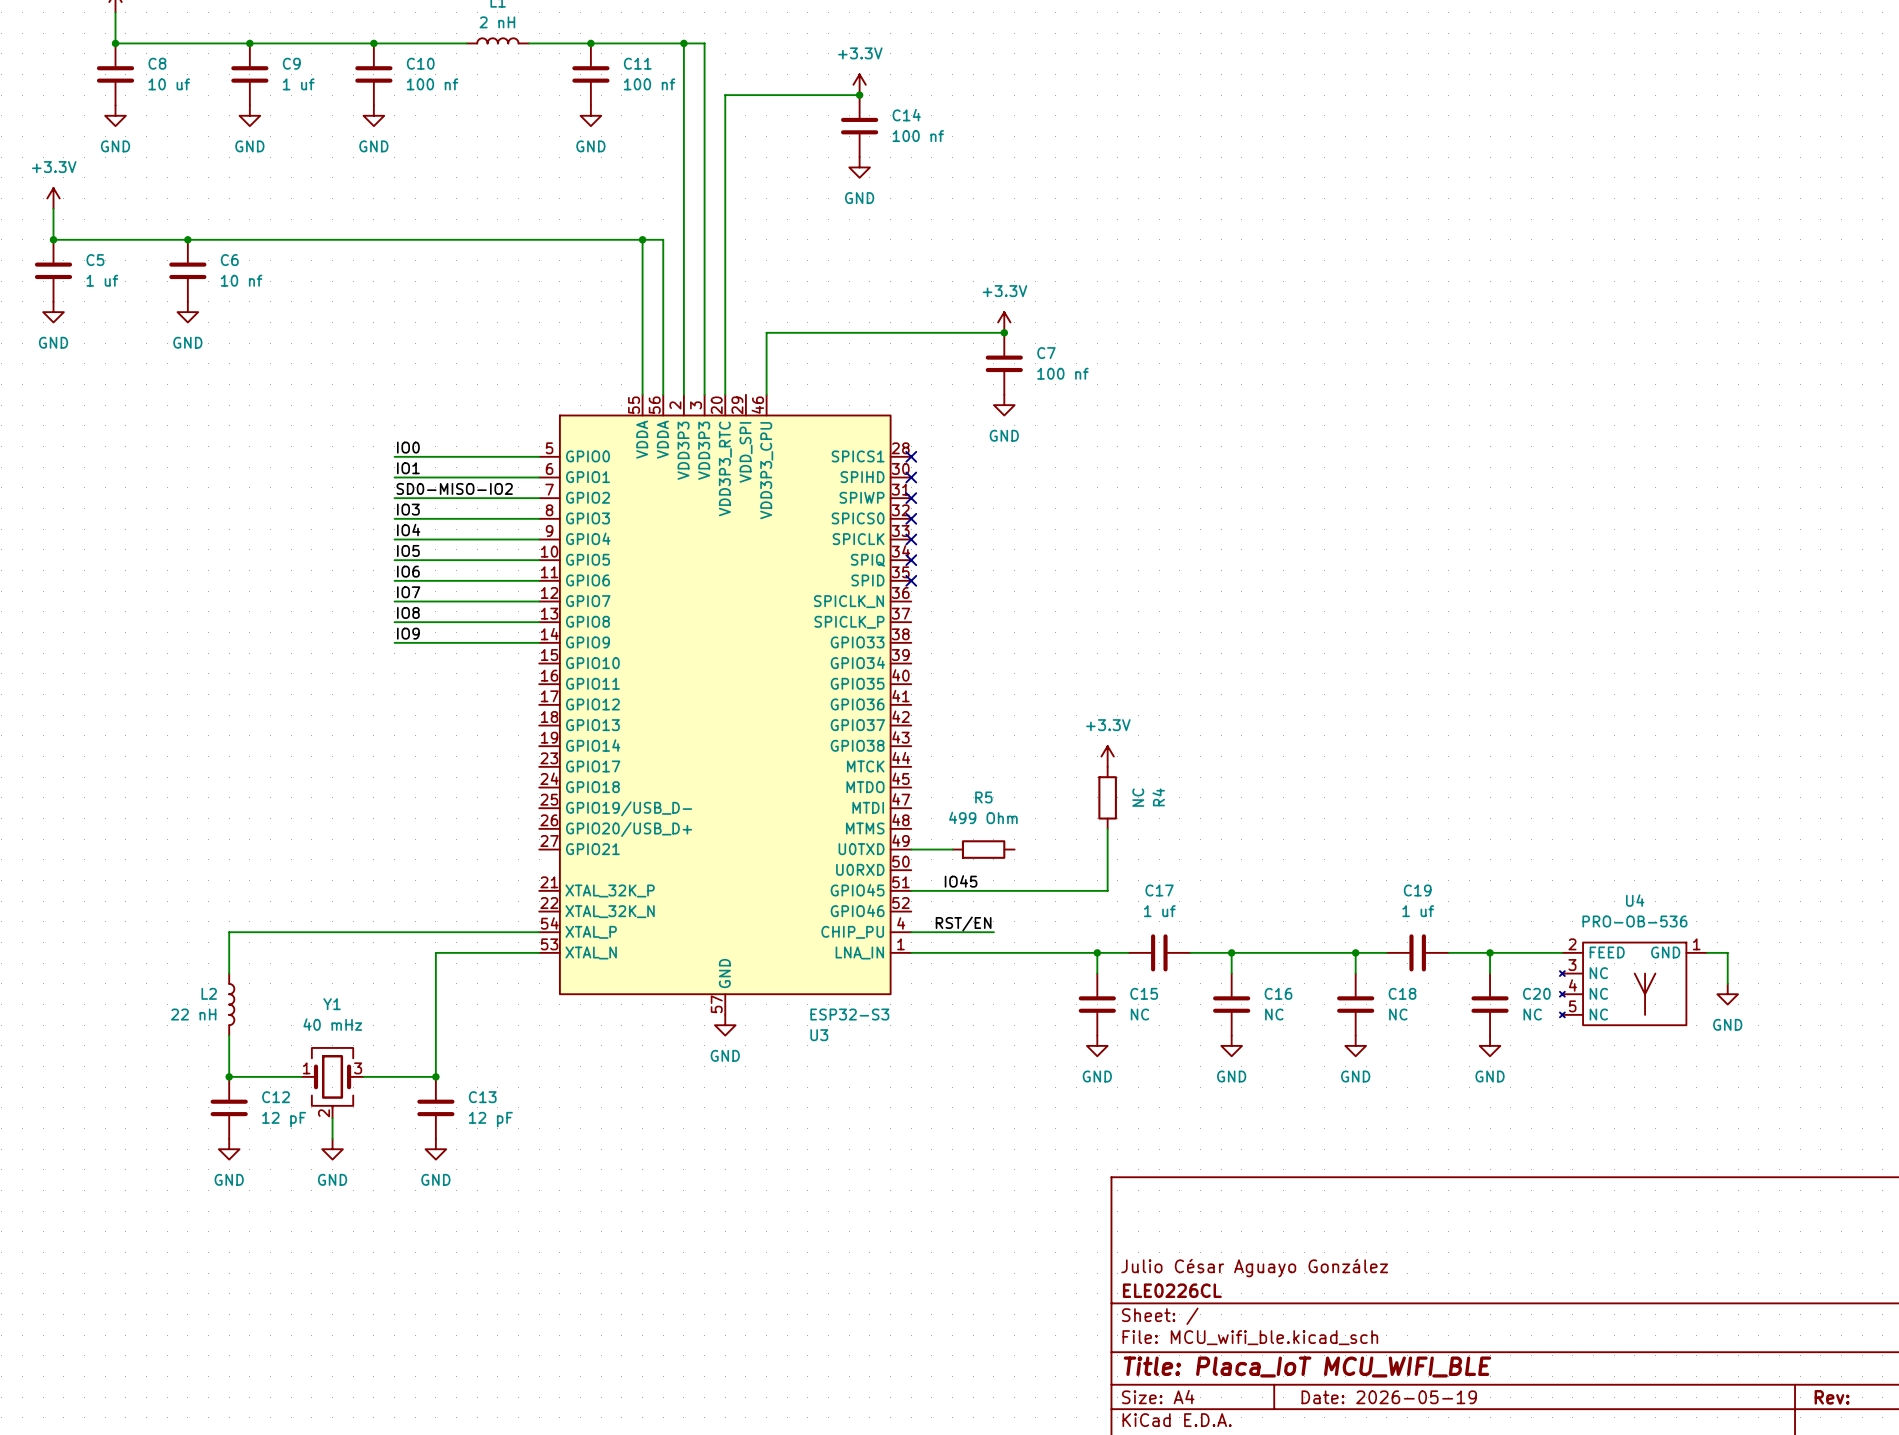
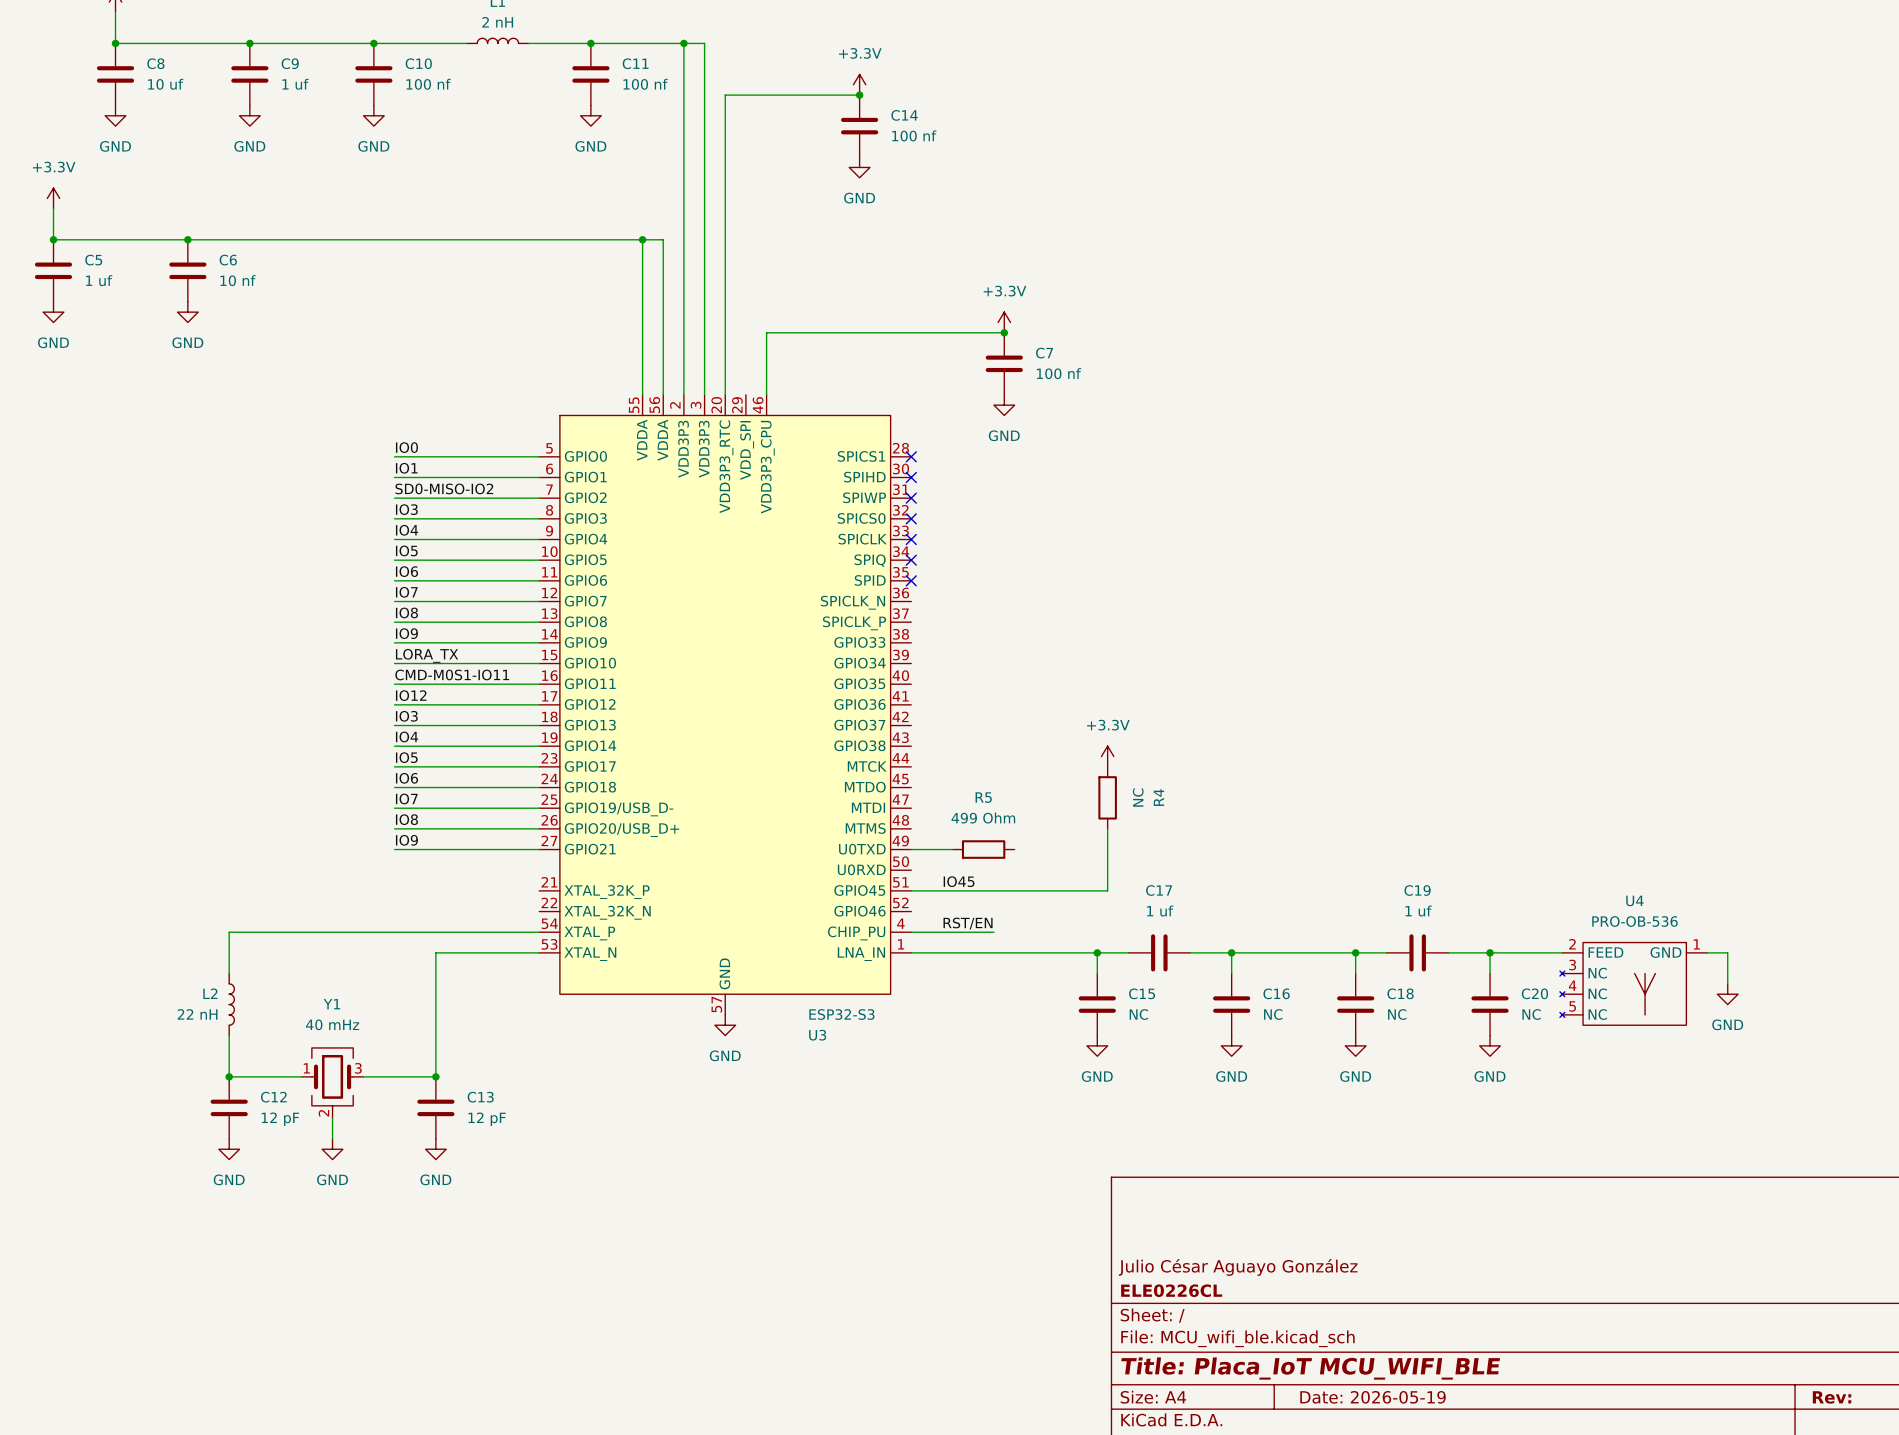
label: none -> LORA_TX (427, 655)
wire: none -> (394, 663) (539, 663)
label: none -> CMD-M0S1-IO11 (452, 674)
wire: none -> (394, 684) (539, 684)
label: none -> IO12 (411, 695)
wire: none -> (394, 704) (539, 704)
label: none -> IO3 (406, 716)
wire: none -> (394, 725) (539, 725)
label: none -> IO4 (407, 736)
wire: none -> (394, 746) (539, 746)
label: none -> IO5 (406, 757)
wire: none -> (394, 766) (539, 766)
label: none -> IO6 (406, 778)
wire: none -> (394, 787) (539, 787)
label: none -> IO7 (406, 798)
wire: none -> (394, 808) (539, 808)
label: none -> IO8 (406, 819)
wire: none -> (394, 828) (539, 828)
label: none -> IO9 (406, 840)
wire: none -> (394, 849) (539, 849)

